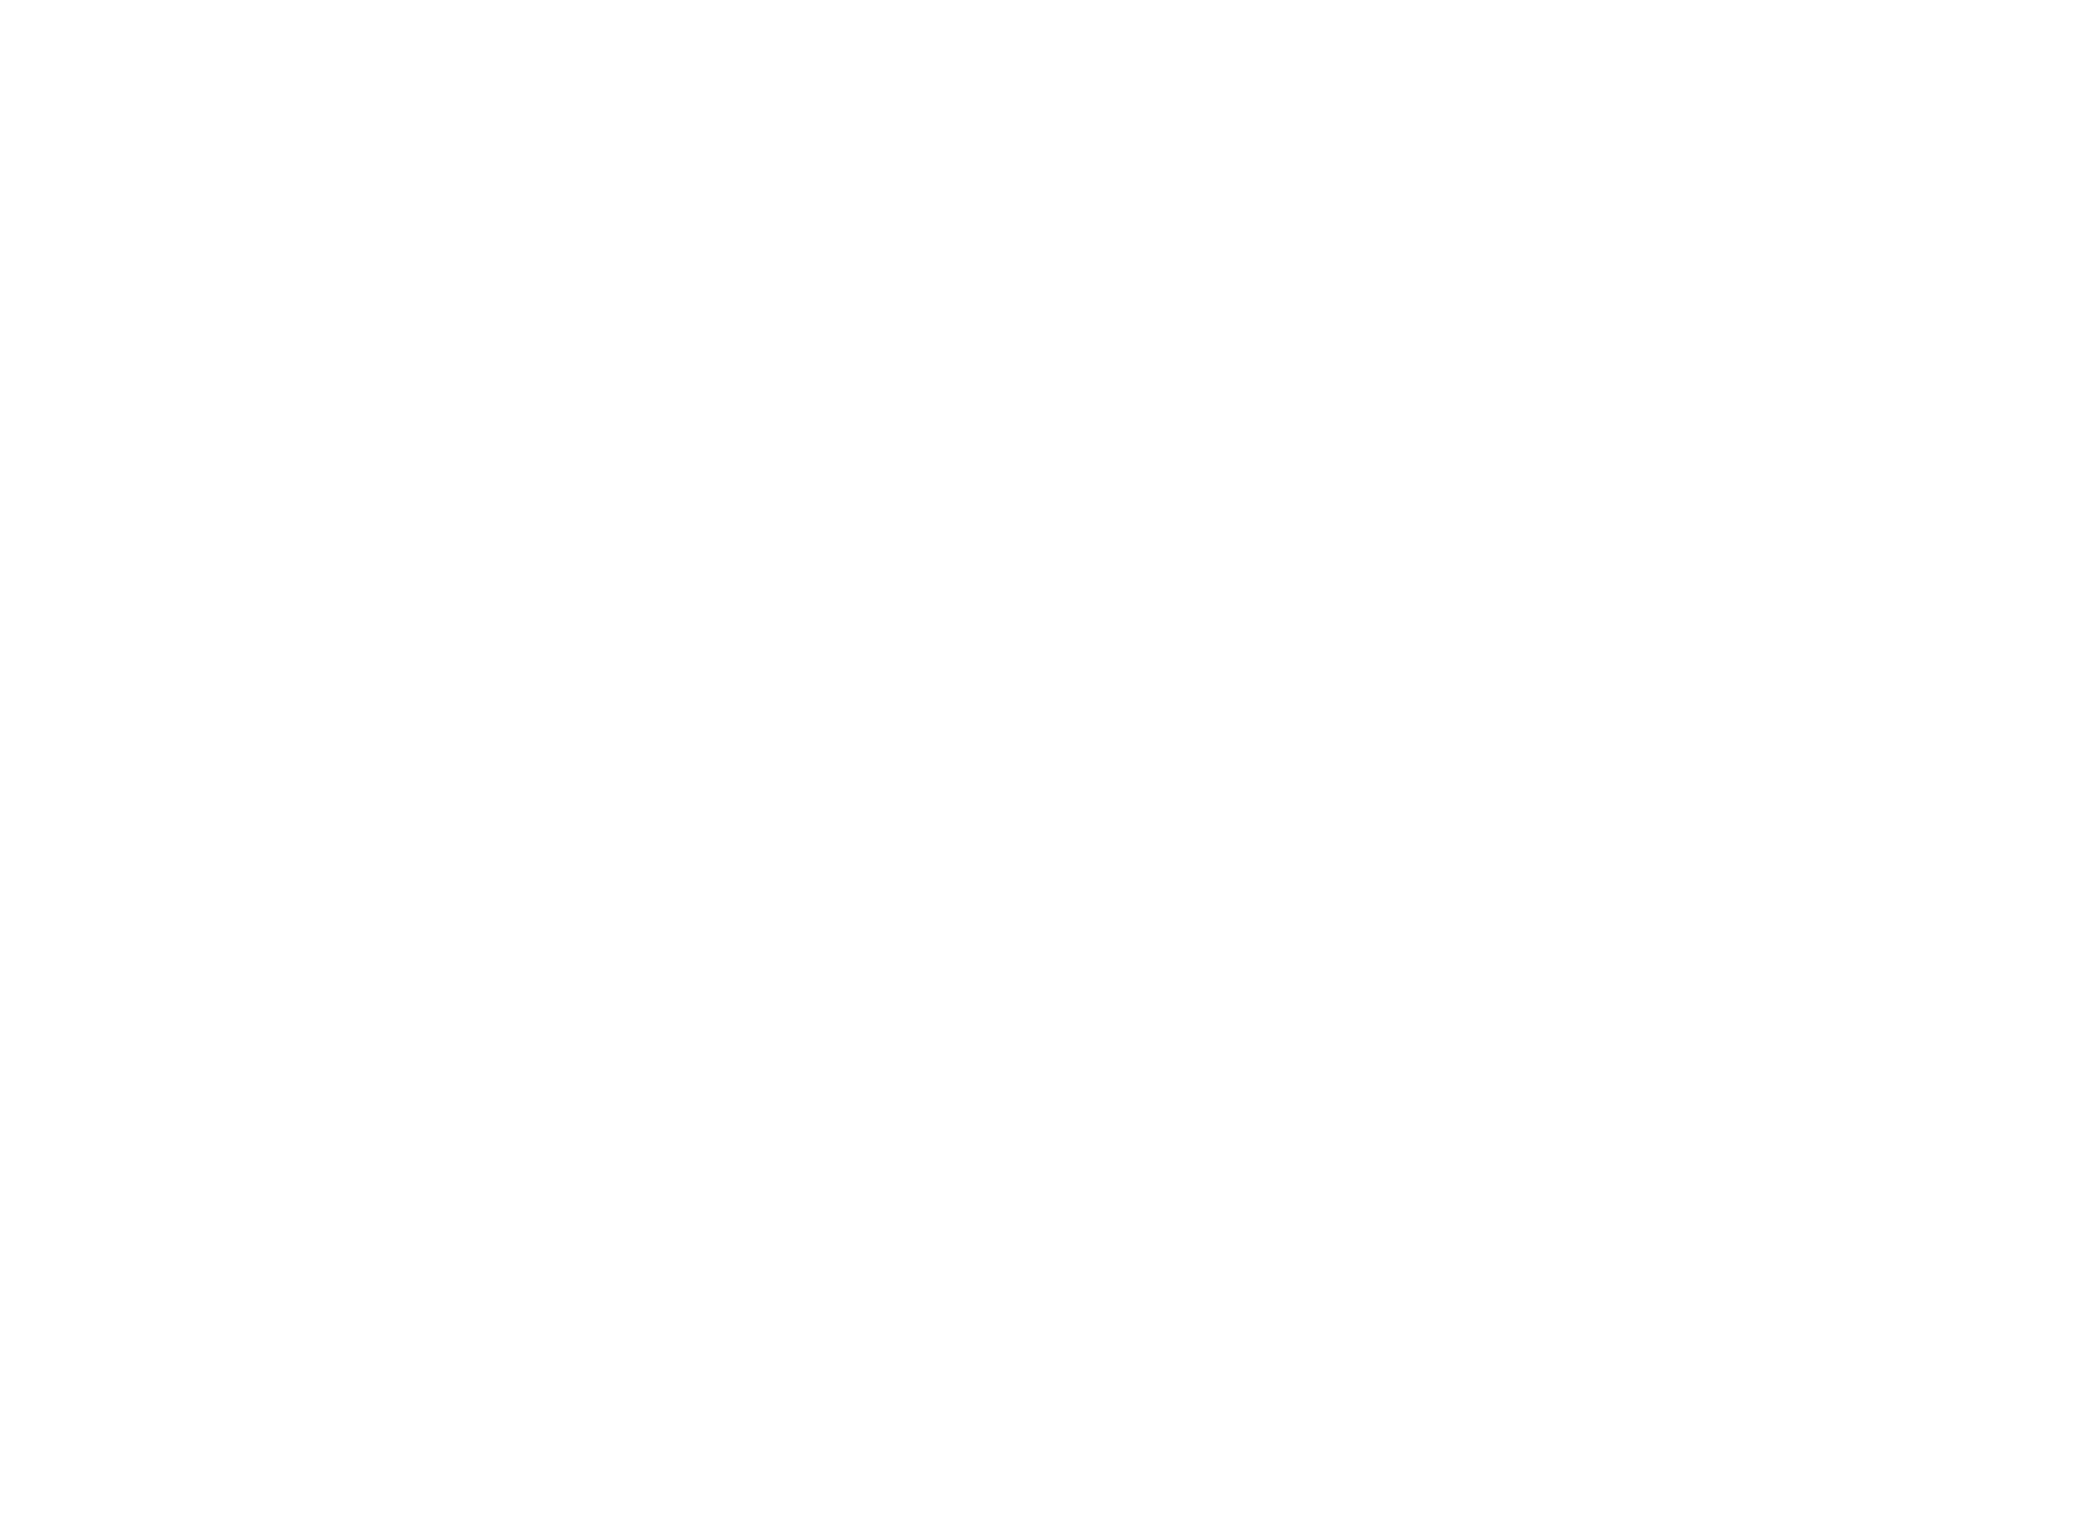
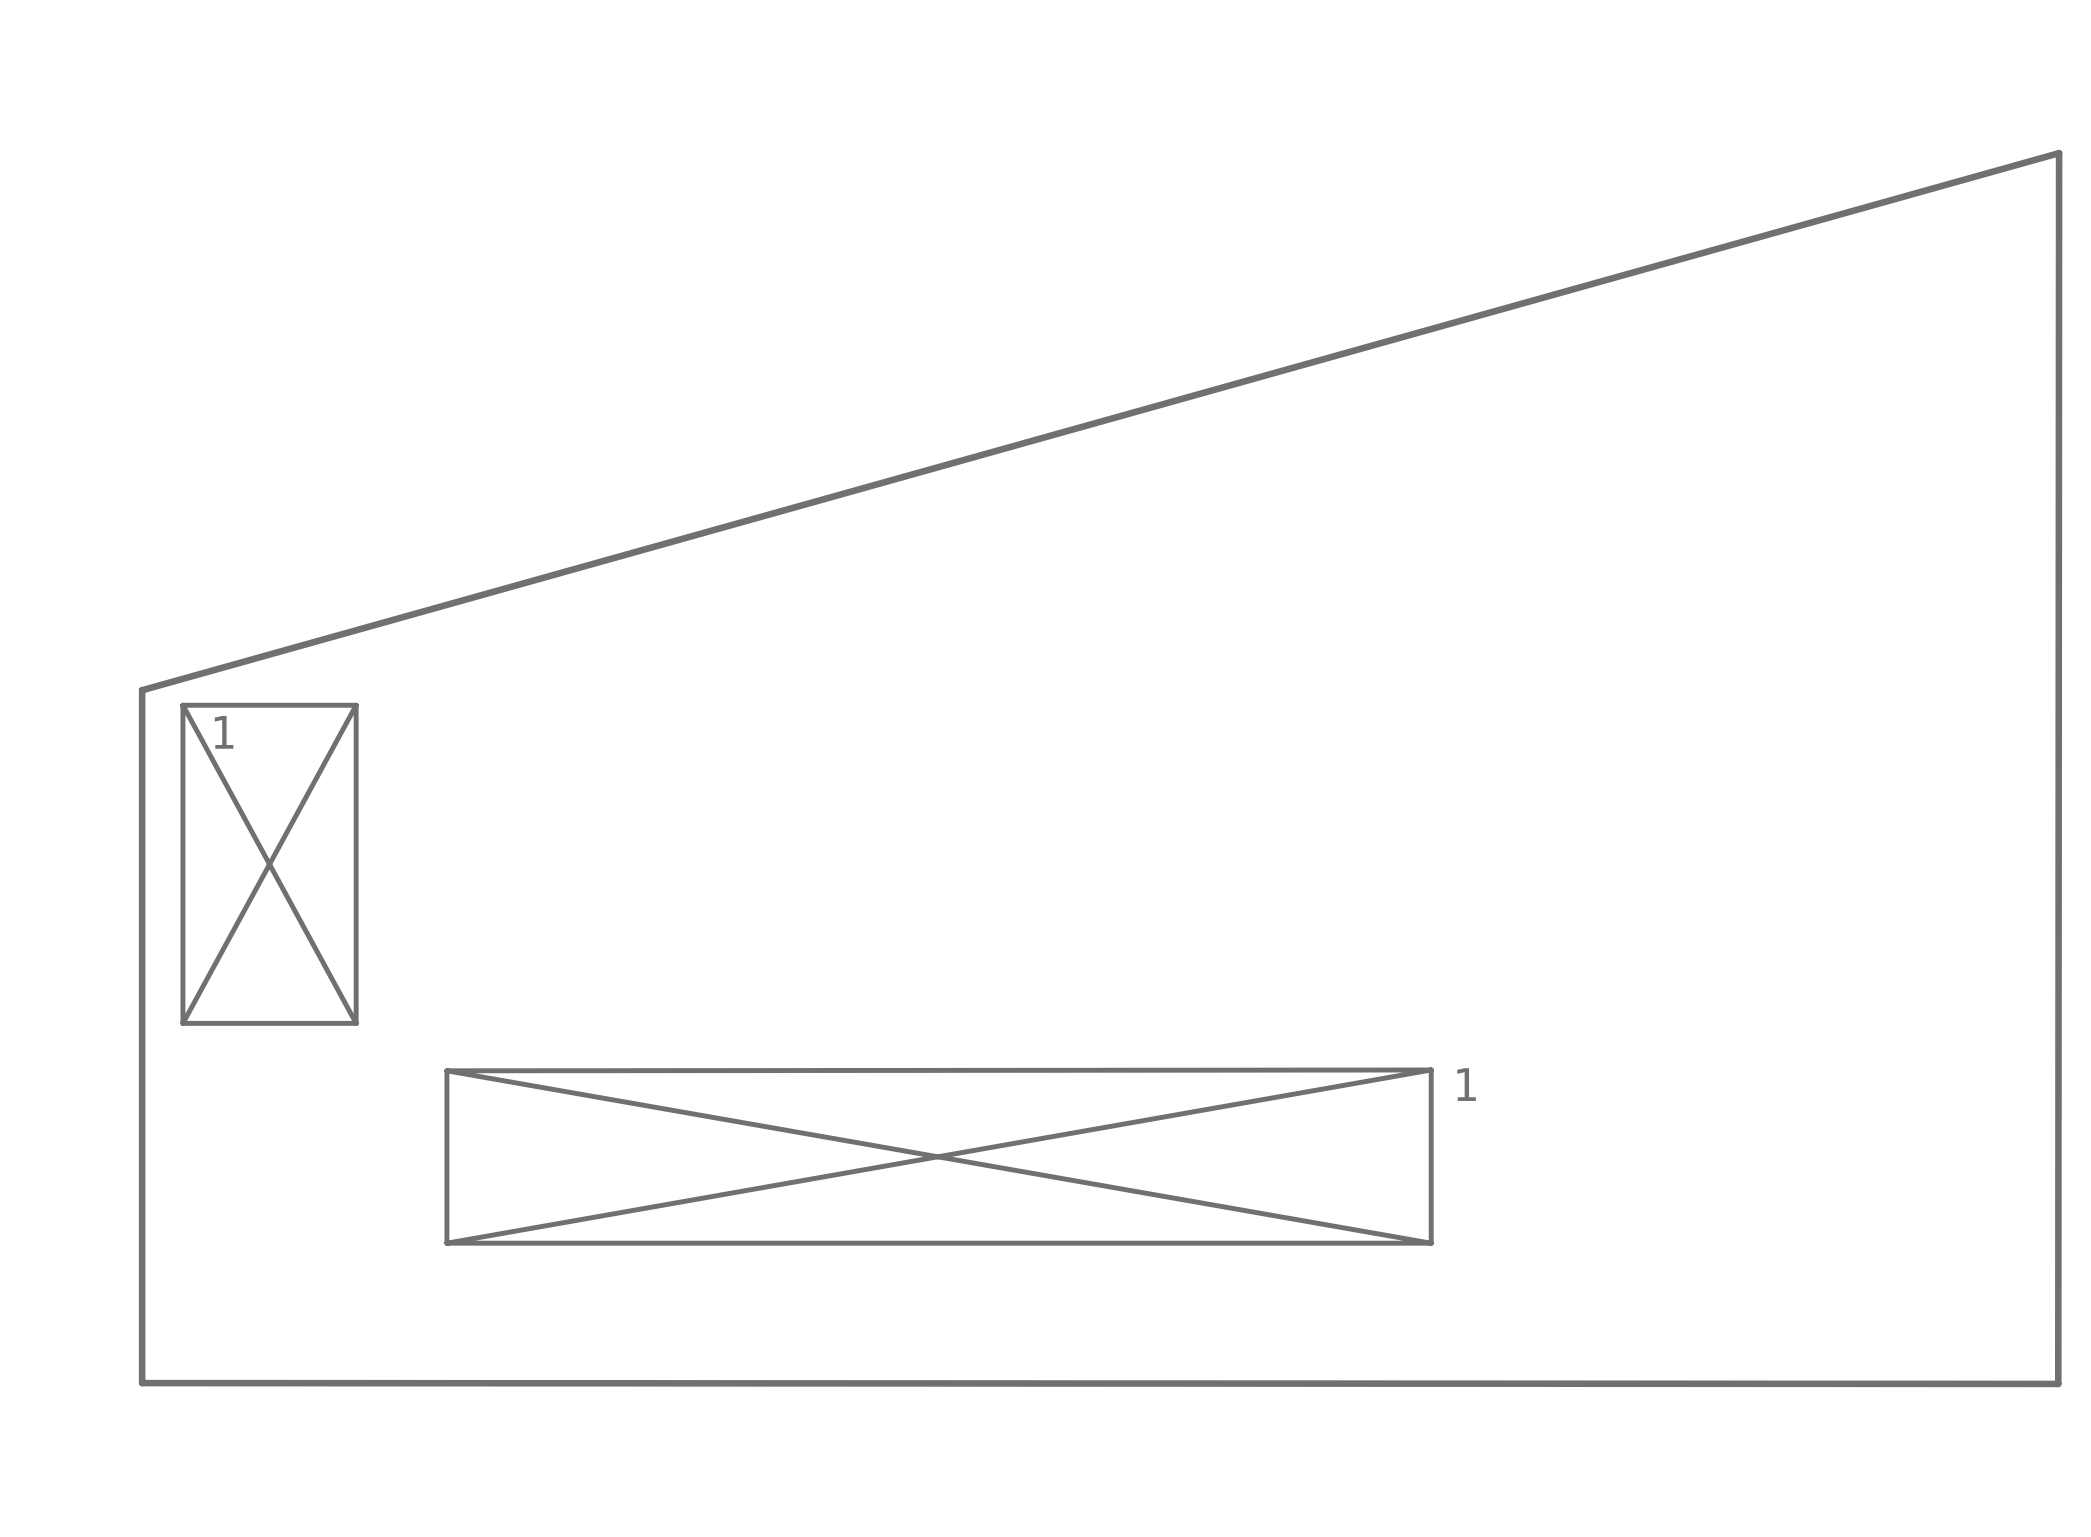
line: none -> (2059, 153) (2058, 1383) (142, 1383) (142, 690) (2059, 153)
line: none -> (182, 705) (182, 1023)
line: none -> (182, 705) (356, 705)
line: none -> (182, 705) (356, 1023)
line: none -> (356, 705) (356, 1023)
line: none -> (356, 705) (182, 1023)
text: none -> 1 (224, 732)
line: none -> (182, 1023) (356, 1023)
line: none -> (1431, 1069) (1431, 1243)
line: none -> (1431, 1069) (446, 1070)
line: none -> (1431, 1069) (446, 1243)
line: none -> (446, 1070) (446, 1243)
line: none -> (446, 1070) (1431, 1243)
text: none -> 1 (1466, 1084)
line: none -> (446, 1243) (1431, 1243)

